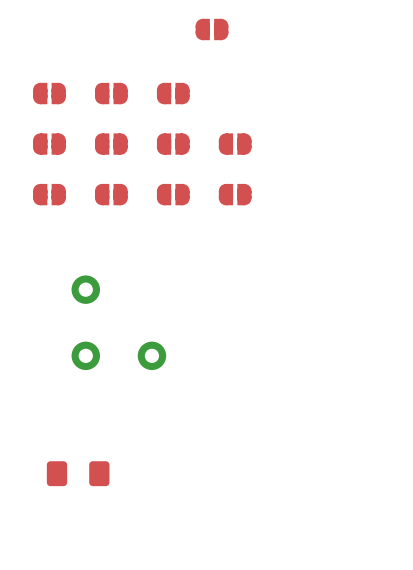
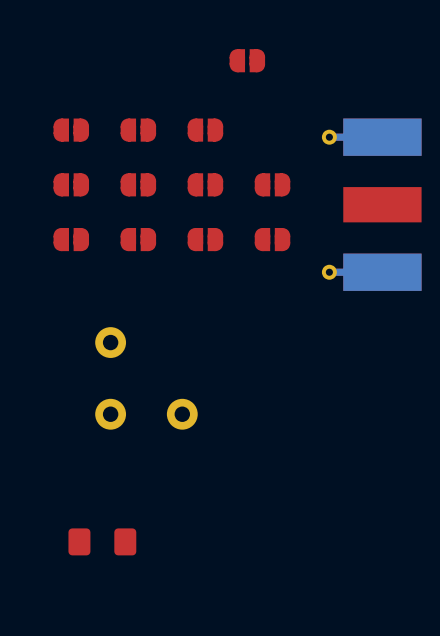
part: none -> (371, 204)

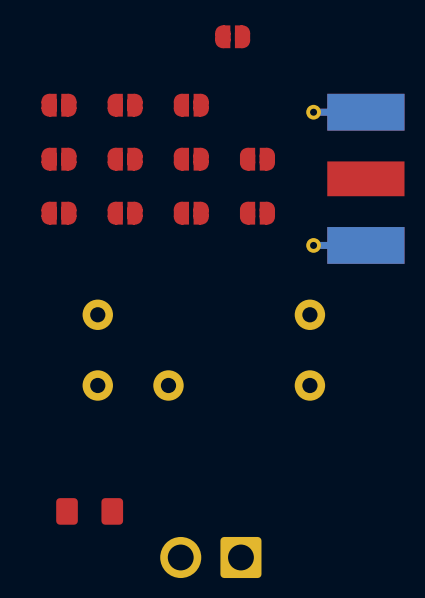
part: none -> (309, 314)
part: none -> (309, 385)
part: none -> (210, 557)

